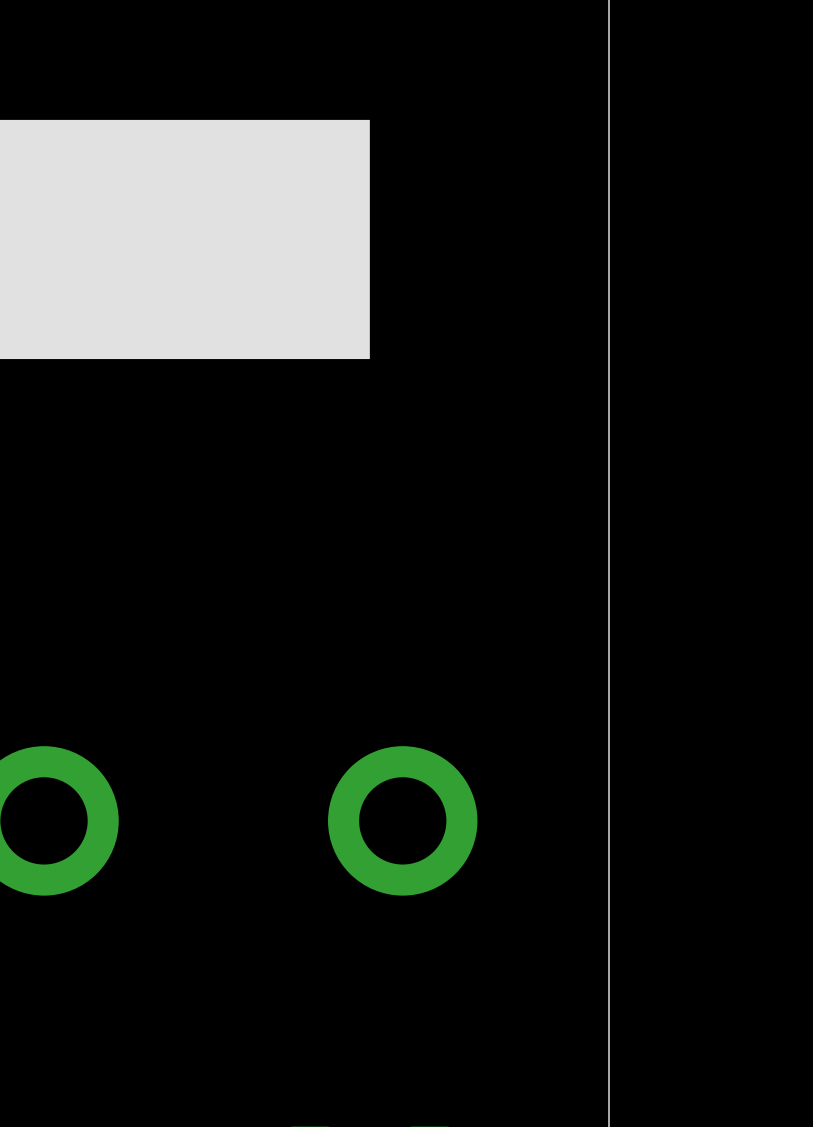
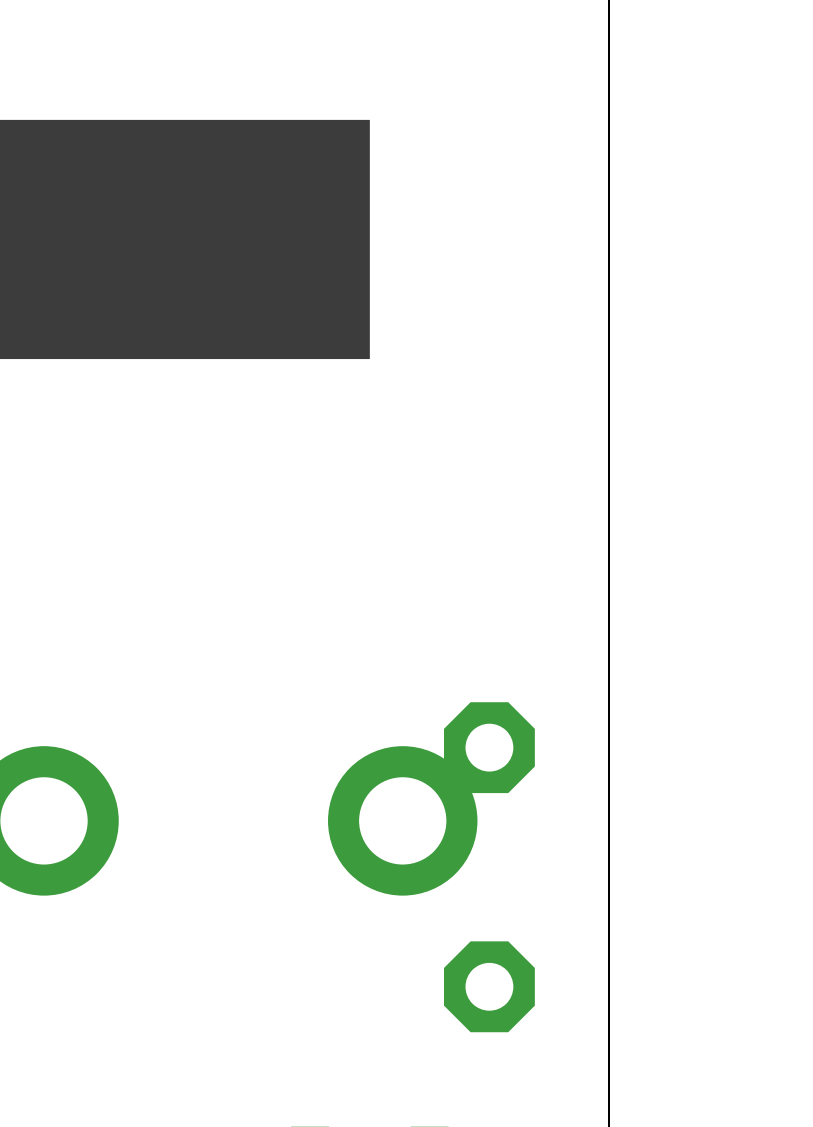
part: none -> (489, 747)
part: none -> (489, 986)

